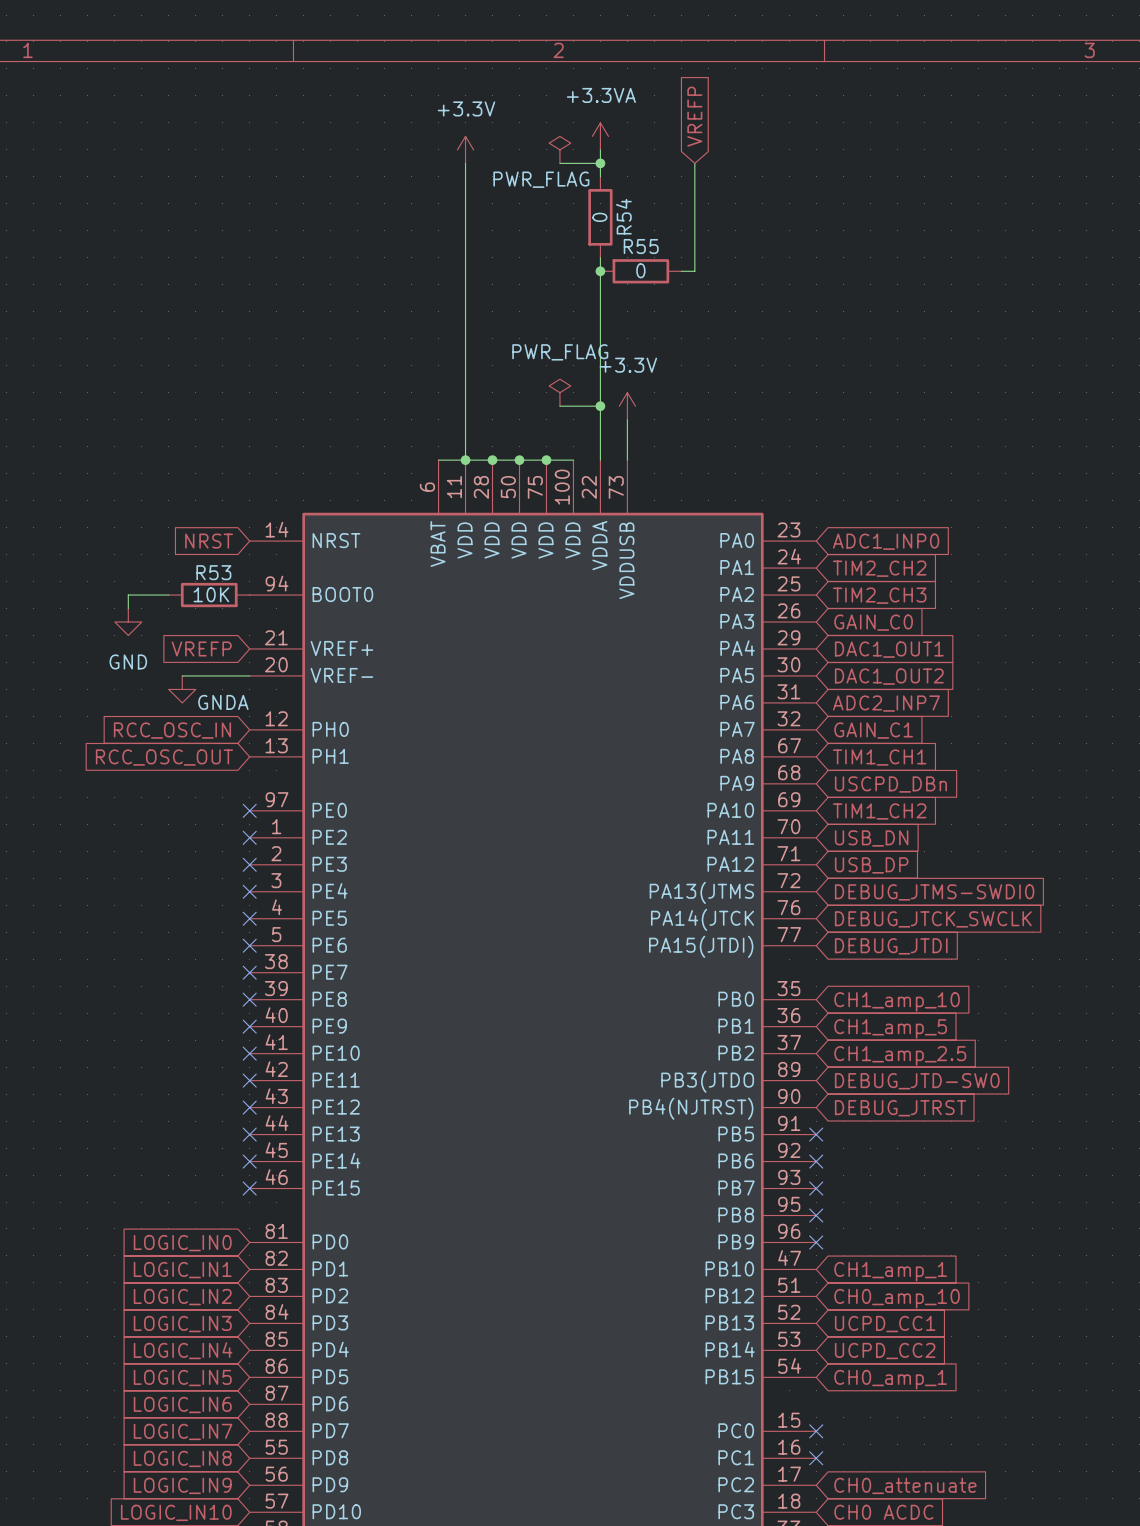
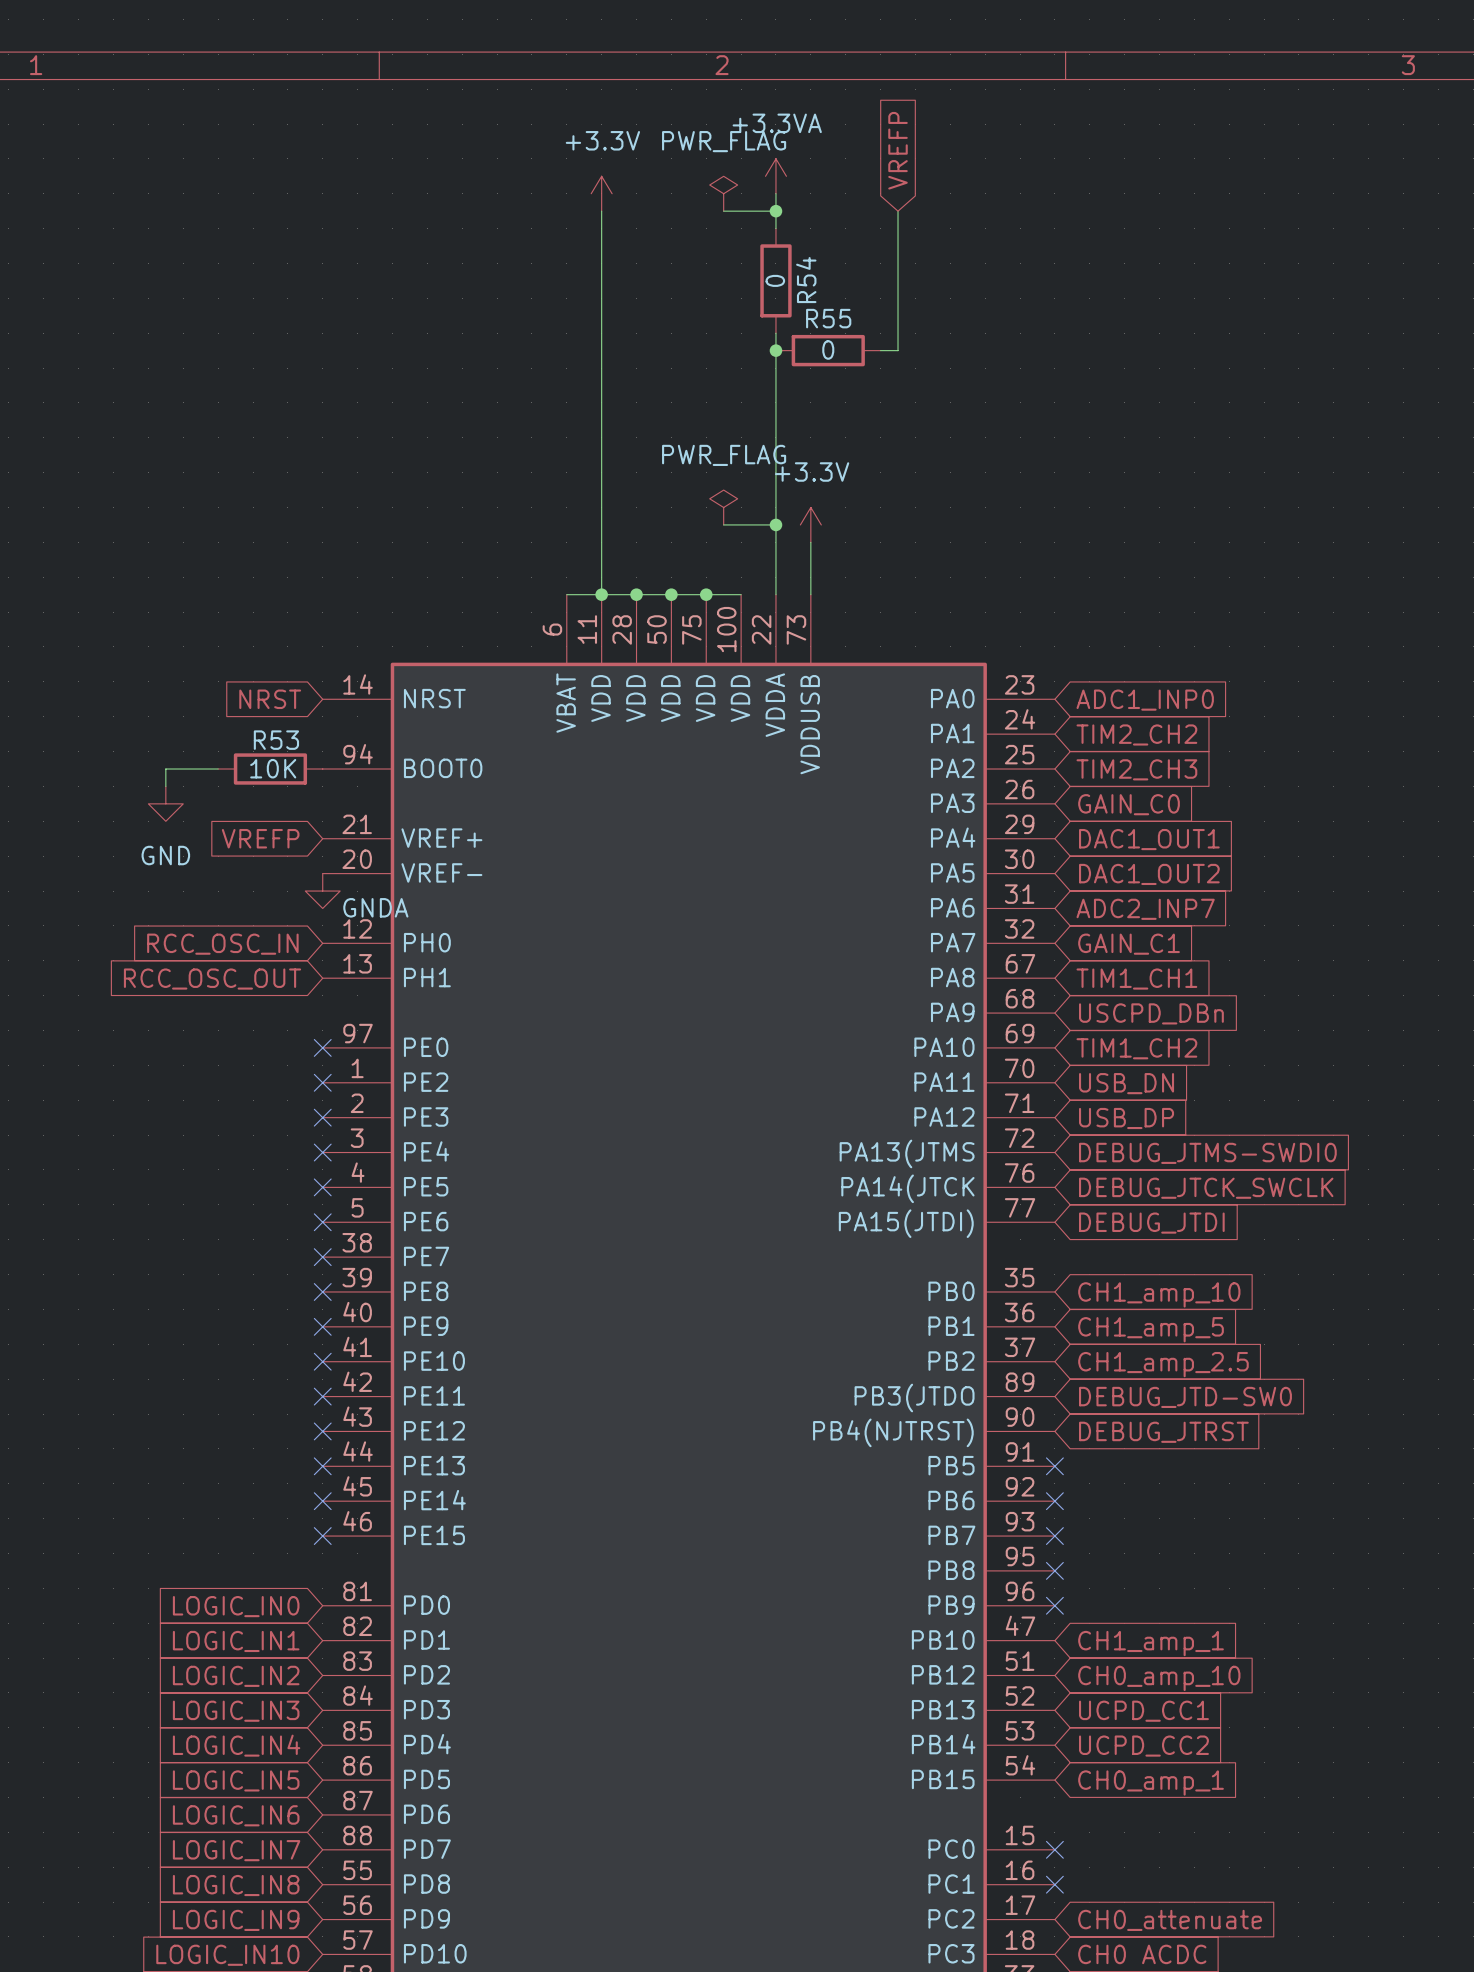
power symbol text position: PWR_FLAG (541, 179) -> PWR_FLAG (724, 141)
wire: (182, 675) (249, 675) -> none
power symbol position: GNDA (182, 689) -> GNDA (322, 891)

